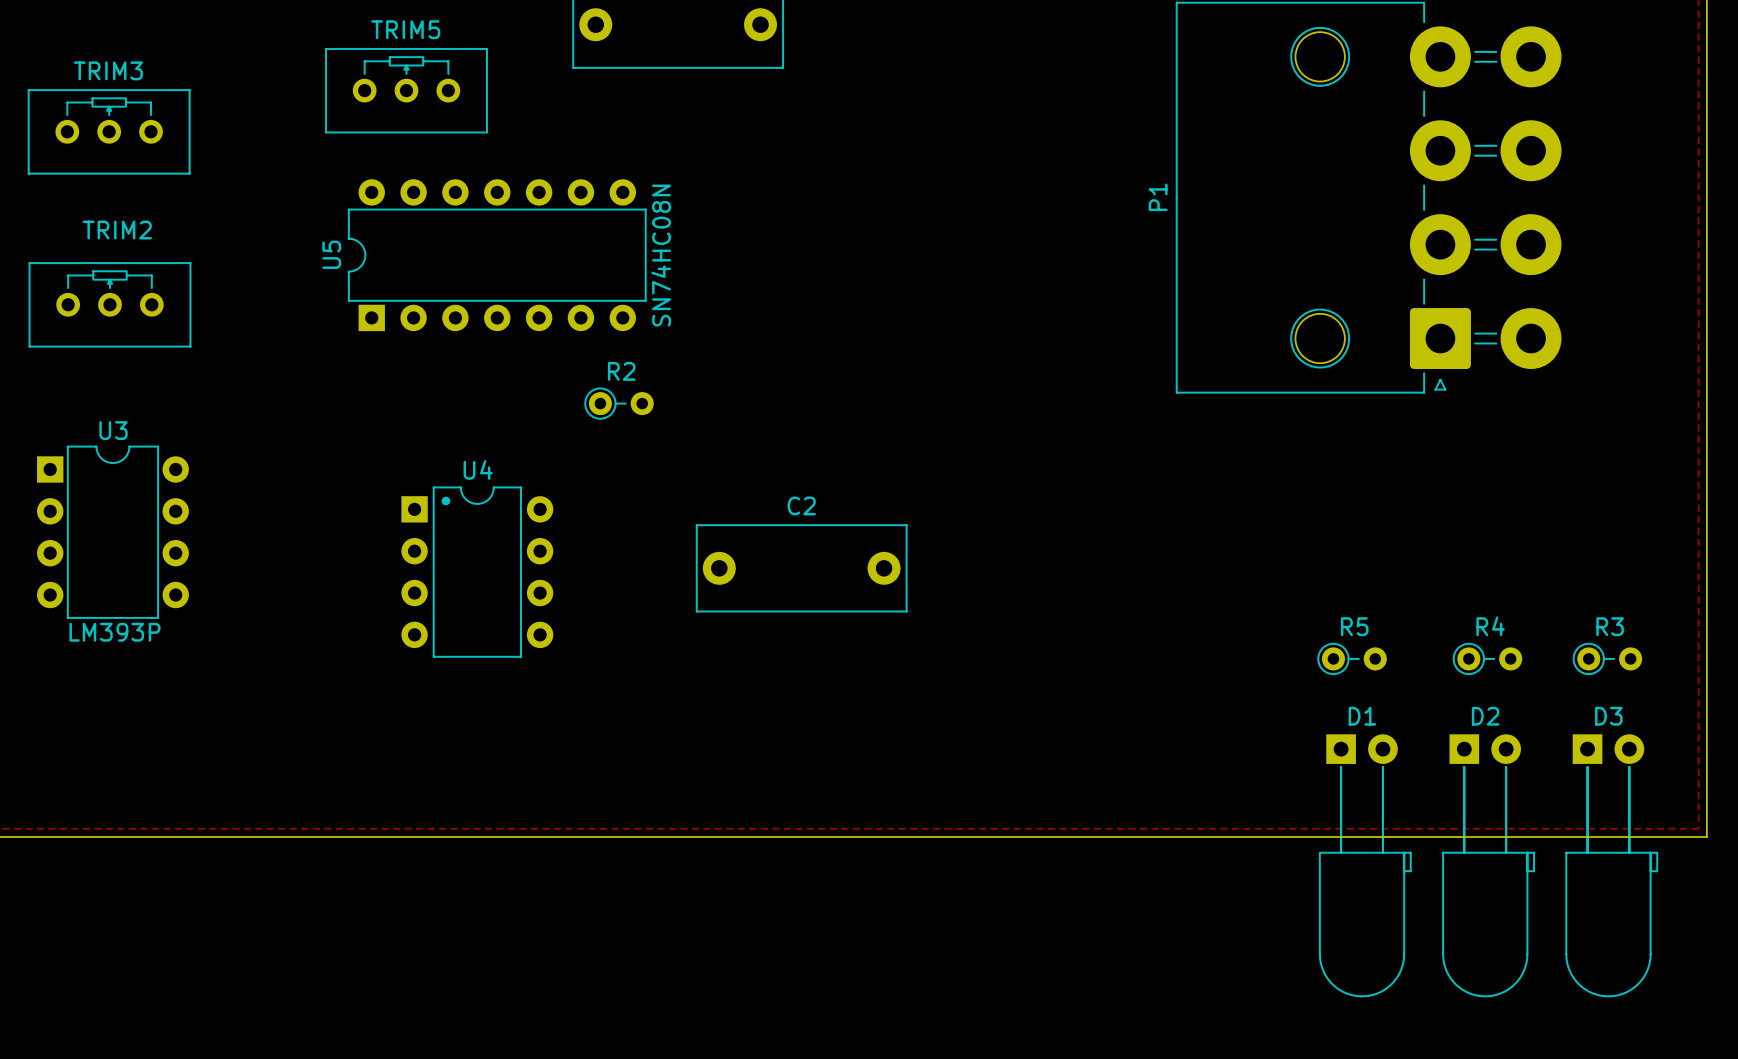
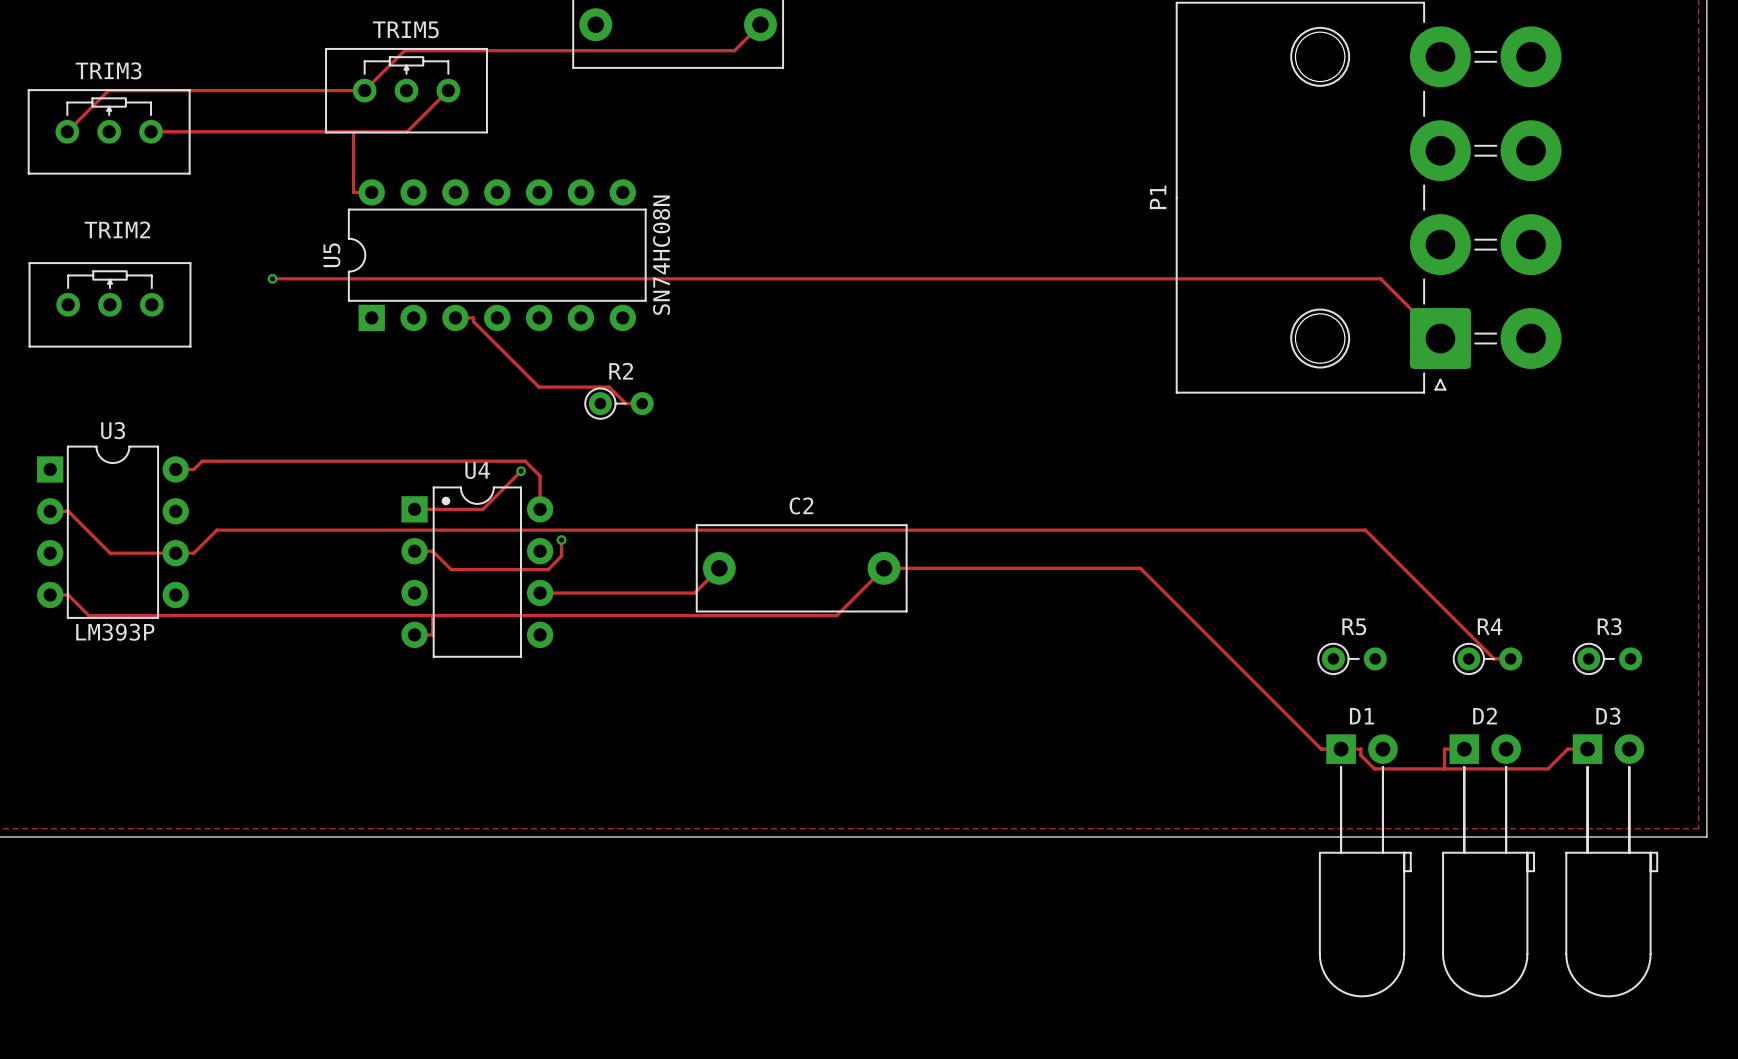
track: none -> (760, 24) (734, 50) (404, 50) (364, 90) (108, 90) (67, 131)
track: none -> (448, 90) (407, 131) (151, 131)
track: none -> (353, 131) (353, 192) (371, 192)
track: none -> (272, 278) (1380, 278) (1440, 338)
via: none -> (272, 278)
track: none -> (455, 317) (473, 317) (473, 321) (538, 387) (609, 387) (625, 403) (642, 403)
track: none -> (175, 469) (193, 469) (202, 461) (525, 461) (540, 476) (540, 509)
track: none -> (521, 471) (482, 509) (414, 509)
via: none -> (521, 471)
track: none -> (50, 511) (68, 511) (110, 553) (193, 553) (216, 530) (1365, 530) (1494, 658) (1510, 658)
track: none -> (561, 540) (561, 556) (548, 569) (451, 569) (432, 551) (414, 551)
via: none -> (561, 540)
track: none -> (719, 568) (694, 593) (540, 593)
track: none -> (50, 595) (68, 595) (88, 615) (836, 615) (884, 568) (1140, 568) (1321, 749) (1360, 749) (1360, 755) (1374, 768) (1547, 768) (1567, 749) (1587, 749)
track: none -> (432, 615) (432, 634) (414, 634)
track: none -> (1464, 749) (1444, 749) (1444, 768)

